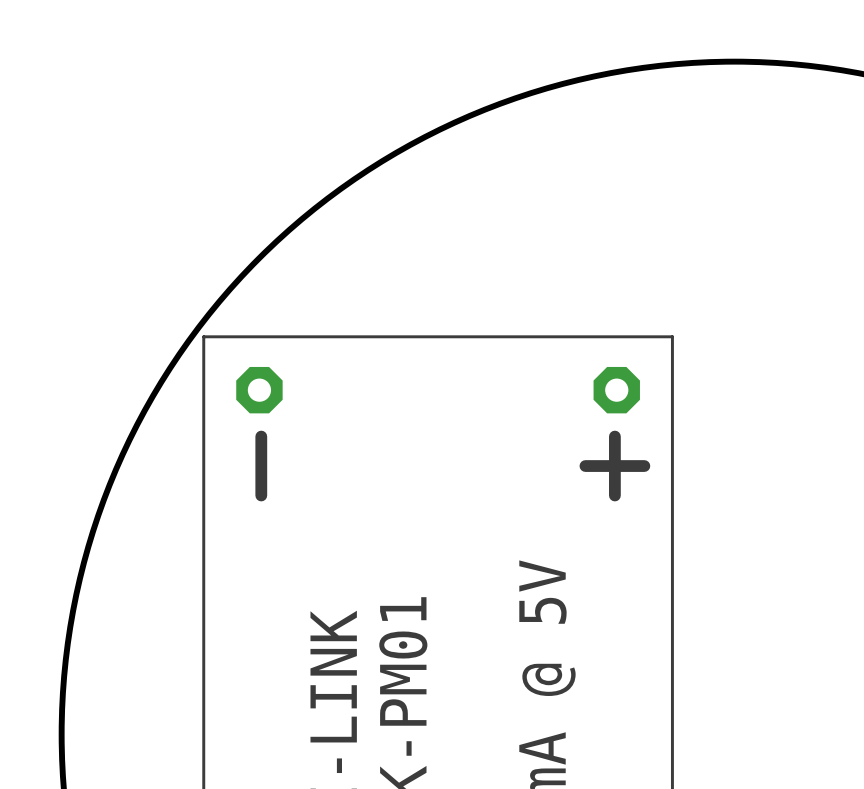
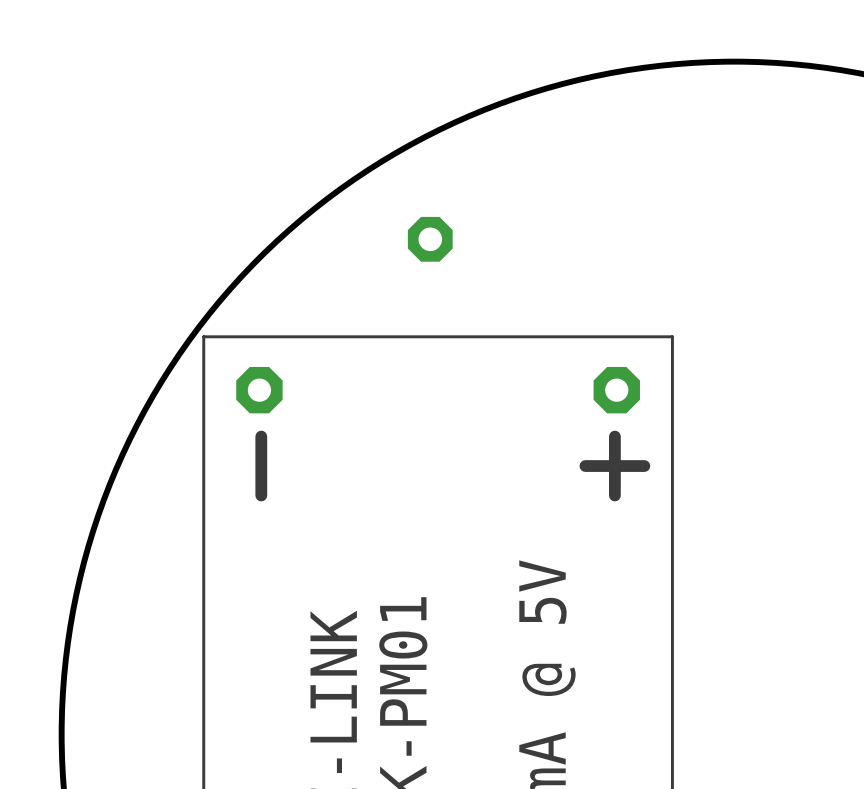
part: none -> (430, 239)

